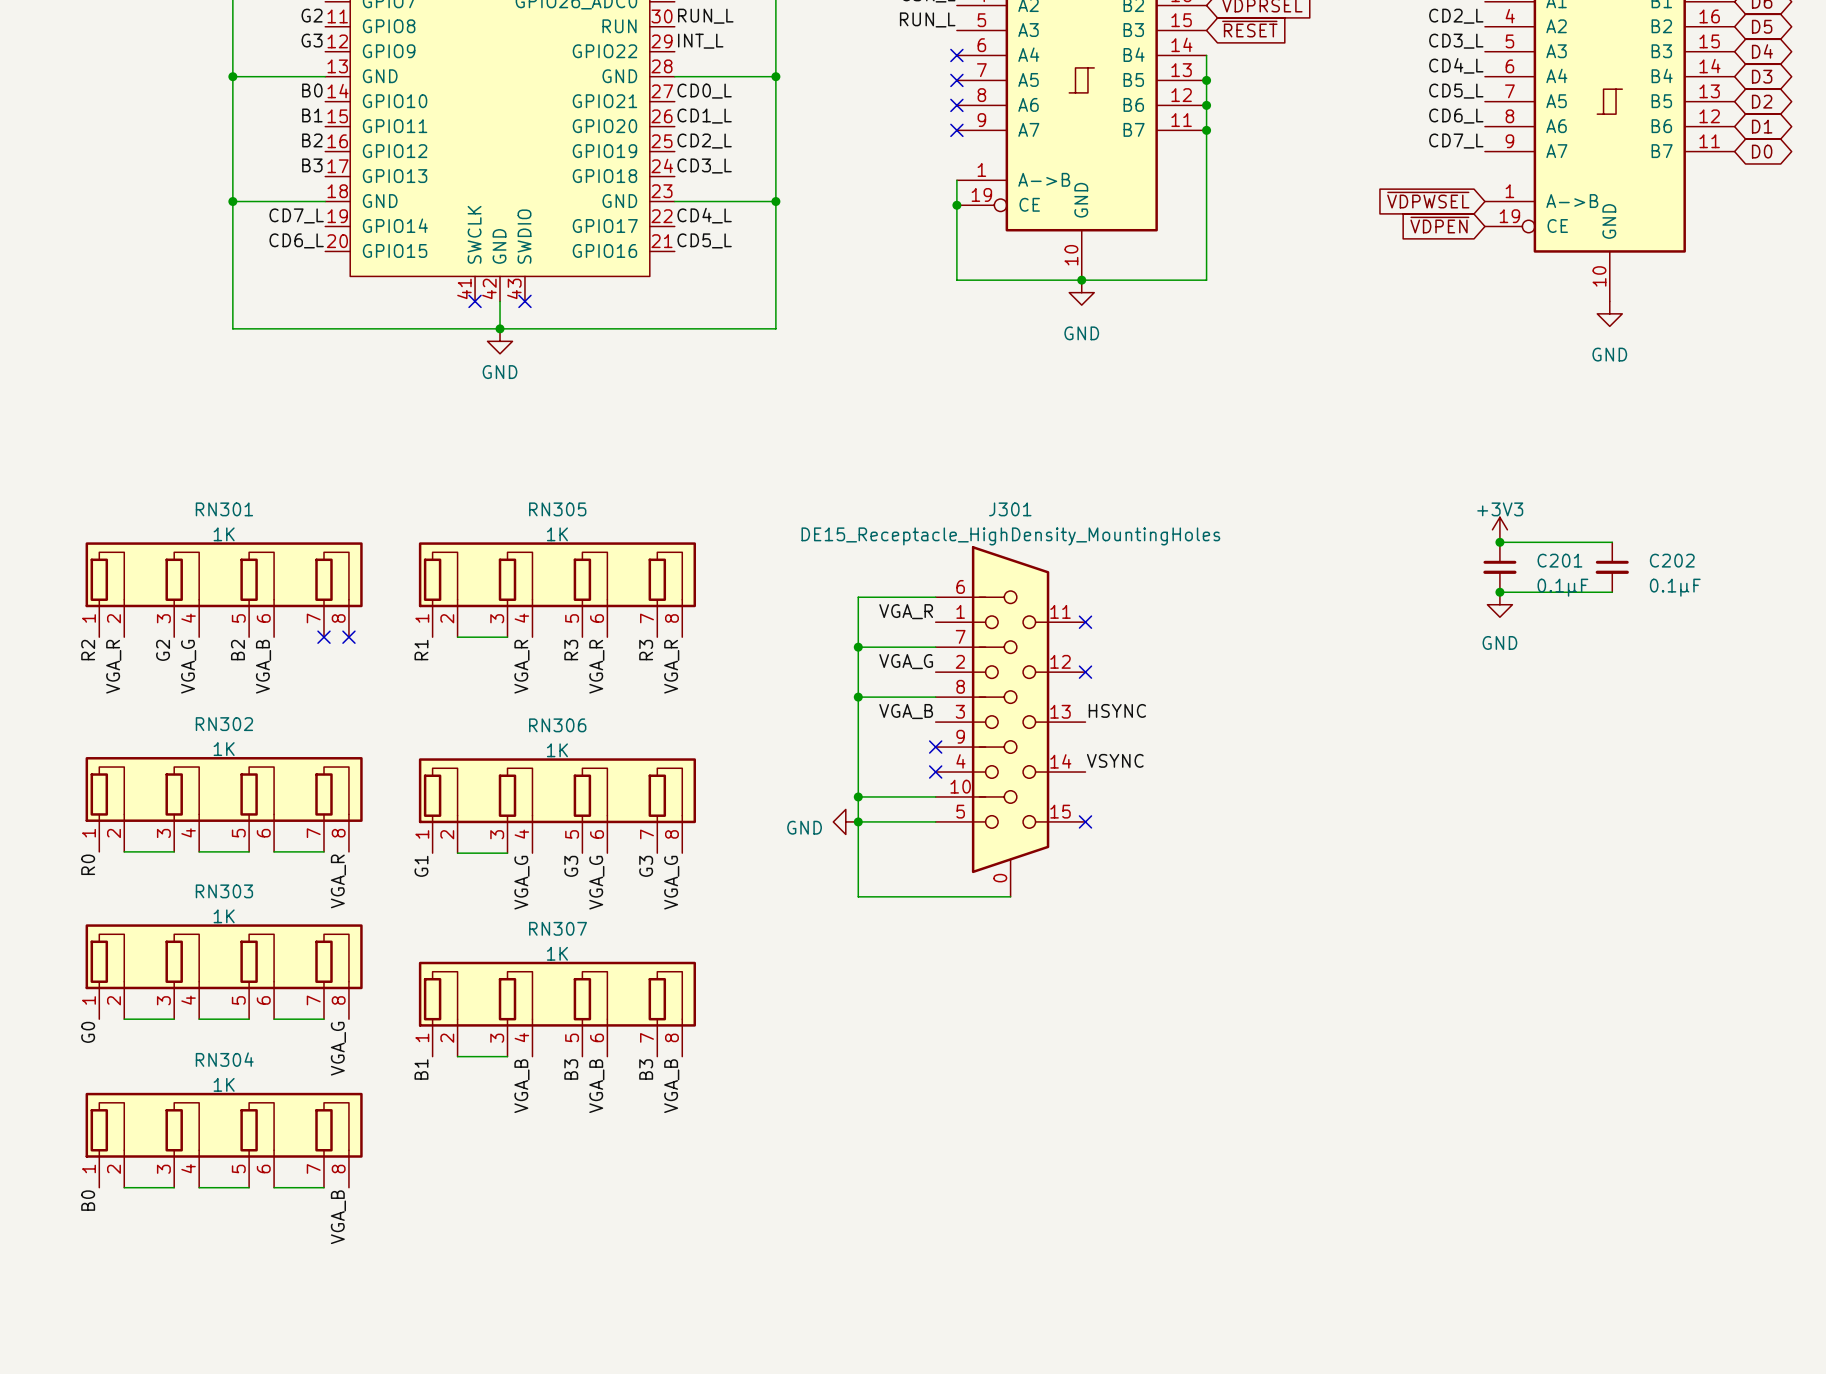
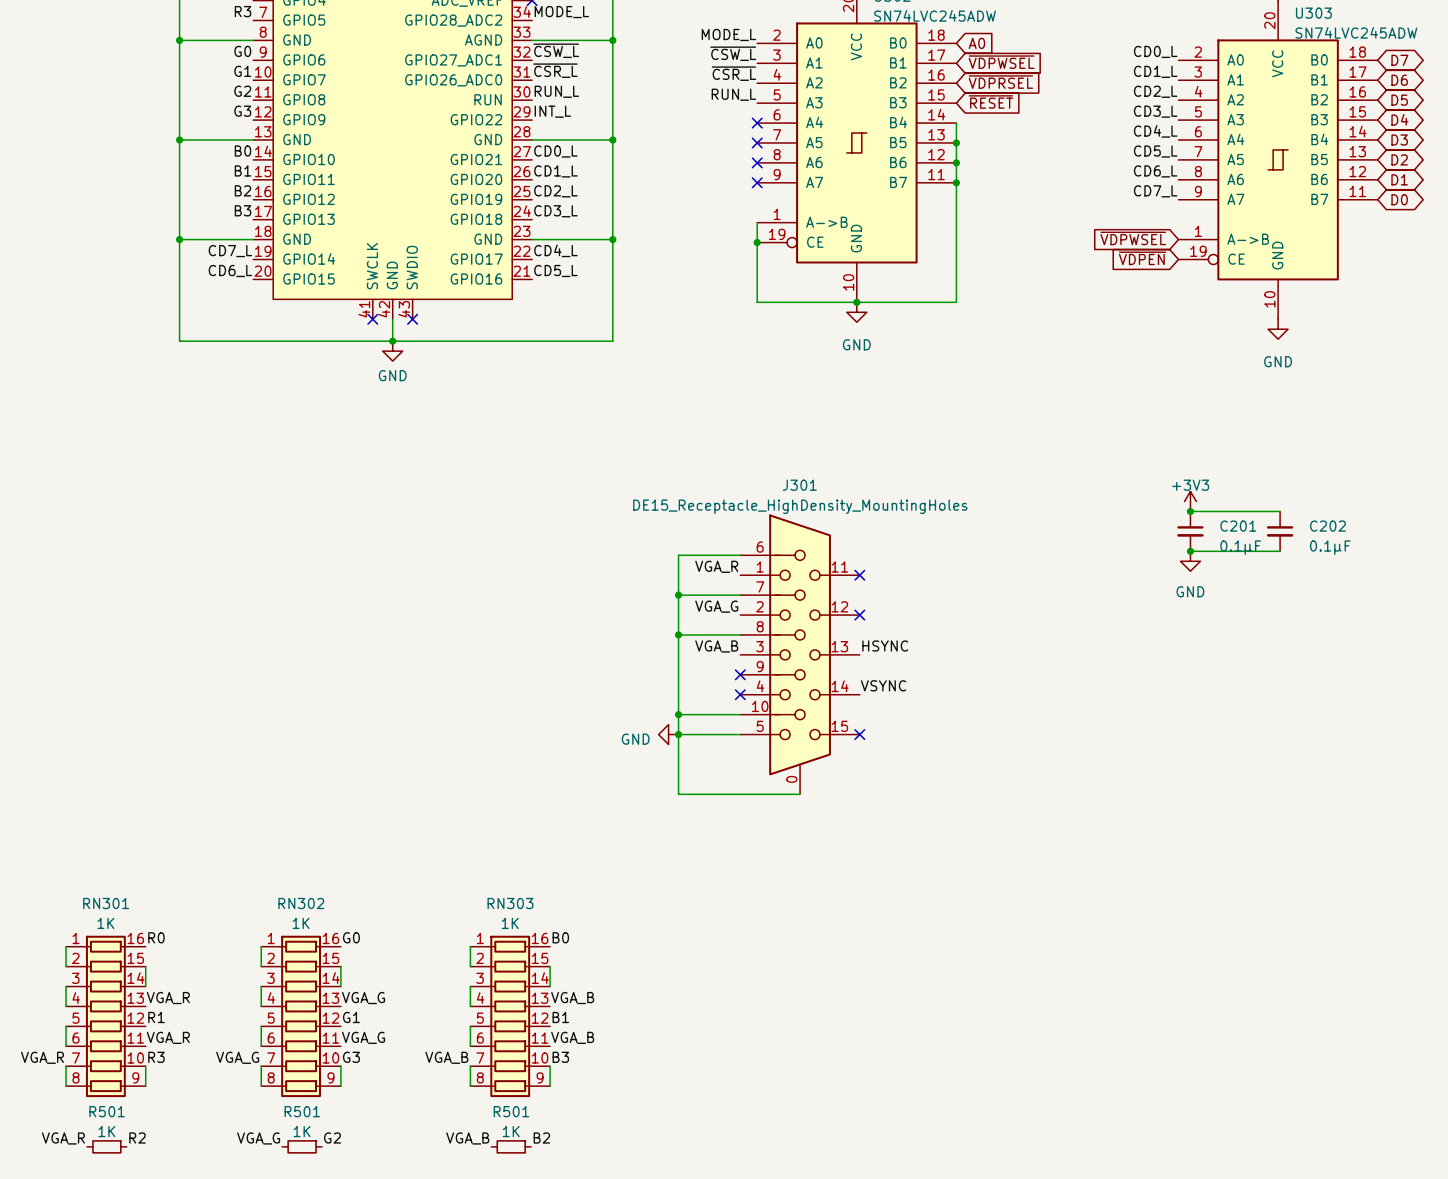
RN301 name position: RN301 (224, 509) -> RN301 (106, 903)
RN301 value position: 1K (224, 534) -> 1K (105, 923)
RN301 symbol: [85, 542, 363, 638] -> [66, 935, 146, 1098]
RN305: 1K (557, 589) -> none
no-connect mark: (323, 637) -> none
no-connect mark: (348, 637) -> none
wire: (457, 637) (507, 637) -> none
label: R2 (88, 650) -> none
label: G2 (163, 650) -> none
label: B2 (237, 650) -> none
label: R1 (421, 650) -> none
label: R3 (571, 650) -> none
label: R3 (646, 650) -> none
label: VGA_R (113, 666) -> none
label: VGA_G (188, 666) -> none
label: VGA_B (263, 666) -> none
label: VGA_R (521, 666) -> none
label: VGA_R (596, 666) -> none
label: VGA_R (671, 666) -> none
RN302 name position: RN302 (224, 724) -> RN302 (301, 903)
RN302 value position: 1K (224, 749) -> 1K (301, 923)
RN302 symbol: [85, 757, 363, 852] -> [261, 935, 341, 1098]
RN306: 1K (557, 805) -> none
wire: (124, 851) (174, 851) -> none
wire: (199, 851) (249, 851) -> none
wire: (274, 851) (323, 851) -> none
wire: (457, 853) (507, 853) -> none
label: R0 (88, 864) -> none
label: G1 (421, 866) -> none
label: G3 (571, 866) -> none
label: G3 (646, 866) -> none
label: VGA_R (338, 881) -> none
label: VGA_G (521, 882) -> none
label: VGA_G (596, 882) -> none
label: VGA_G (671, 882) -> none
RN303 name position: RN303 (224, 891) -> RN303 (510, 903)
RN303 value position: 1K (224, 916) -> 1K (510, 923)
RN303 symbol: [85, 924, 363, 1020] -> [470, 935, 551, 1098]
RN307: 1K (557, 1009) -> none
wire: (124, 1019) (174, 1019) -> none
wire: (199, 1019) (249, 1019) -> none
wire: (274, 1019) (323, 1019) -> none
label: G0 (88, 1032) -> none
label: VGA_G (338, 1048) -> none
wire: (457, 1056) (507, 1056) -> none
label: B1 (421, 1069) -> none
label: B3 (571, 1069) -> none
label: B3 (646, 1069) -> none
label: none -> R0 (156, 937)
label: none -> G0 (351, 937)
label: none -> B0 (560, 937)
label: VGA_B (521, 1086) -> none
label: VGA_B (596, 1086) -> none
label: VGA_B (671, 1086) -> none
wire: none -> (470, 946) (470, 966)
wire: none -> (340, 966) (340, 986)
wire: none -> (550, 966) (550, 986)
wire: none -> (470, 986) (470, 1006)
RN304: 1K (224, 1140) -> none
label: none -> VGA_R (168, 998)
label: none -> VGA_G (363, 998)
label: none -> VGA_B (572, 998)
label: none -> R1 (156, 1017)
label: none -> G1 (351, 1017)
label: none -> B1 (560, 1017)
wire: none -> (66, 1026) (66, 1046)
wire: (199, 1187) (249, 1187) -> none
wire: (274, 1187) (323, 1187) -> none
wire: none -> (261, 1026) (261, 1046)
wire: none -> (470, 1026) (470, 1046)
label: B0 (88, 1200) -> none
label: none -> VGA_R (168, 1037)
label: none -> VGA_G (363, 1037)
label: none -> VGA_B (572, 1037)
label: VGA_B (338, 1217) -> VGA_G (237, 1057)
label: none -> R3 (156, 1057)
label: none -> G3 (351, 1057)
label: none -> B3 (560, 1057)
label: none -> VGA_R (42, 1057)
label: none -> VGA_B (446, 1057)
wire: none -> (66, 1066) (66, 1086)
wire: none -> (145, 1066) (145, 1086)
wire: none -> (261, 1066) (261, 1086)
wire: none -> (340, 1066) (340, 1086)
wire: none -> (470, 1066) (470, 1086)
wire: none -> (550, 1066) (550, 1086)
label: none -> R2 (137, 1137)
label: none -> G2 (332, 1137)
label: none -> B2 (541, 1137)
label: none -> VGA_R (63, 1138)
label: none -> VGA_G (258, 1138)
label: none -> VGA_B (467, 1138)
R501: none -> 1K (106, 1146)
R501: none -> 1K (302, 1146)
R501: none -> 1K (511, 1146)

